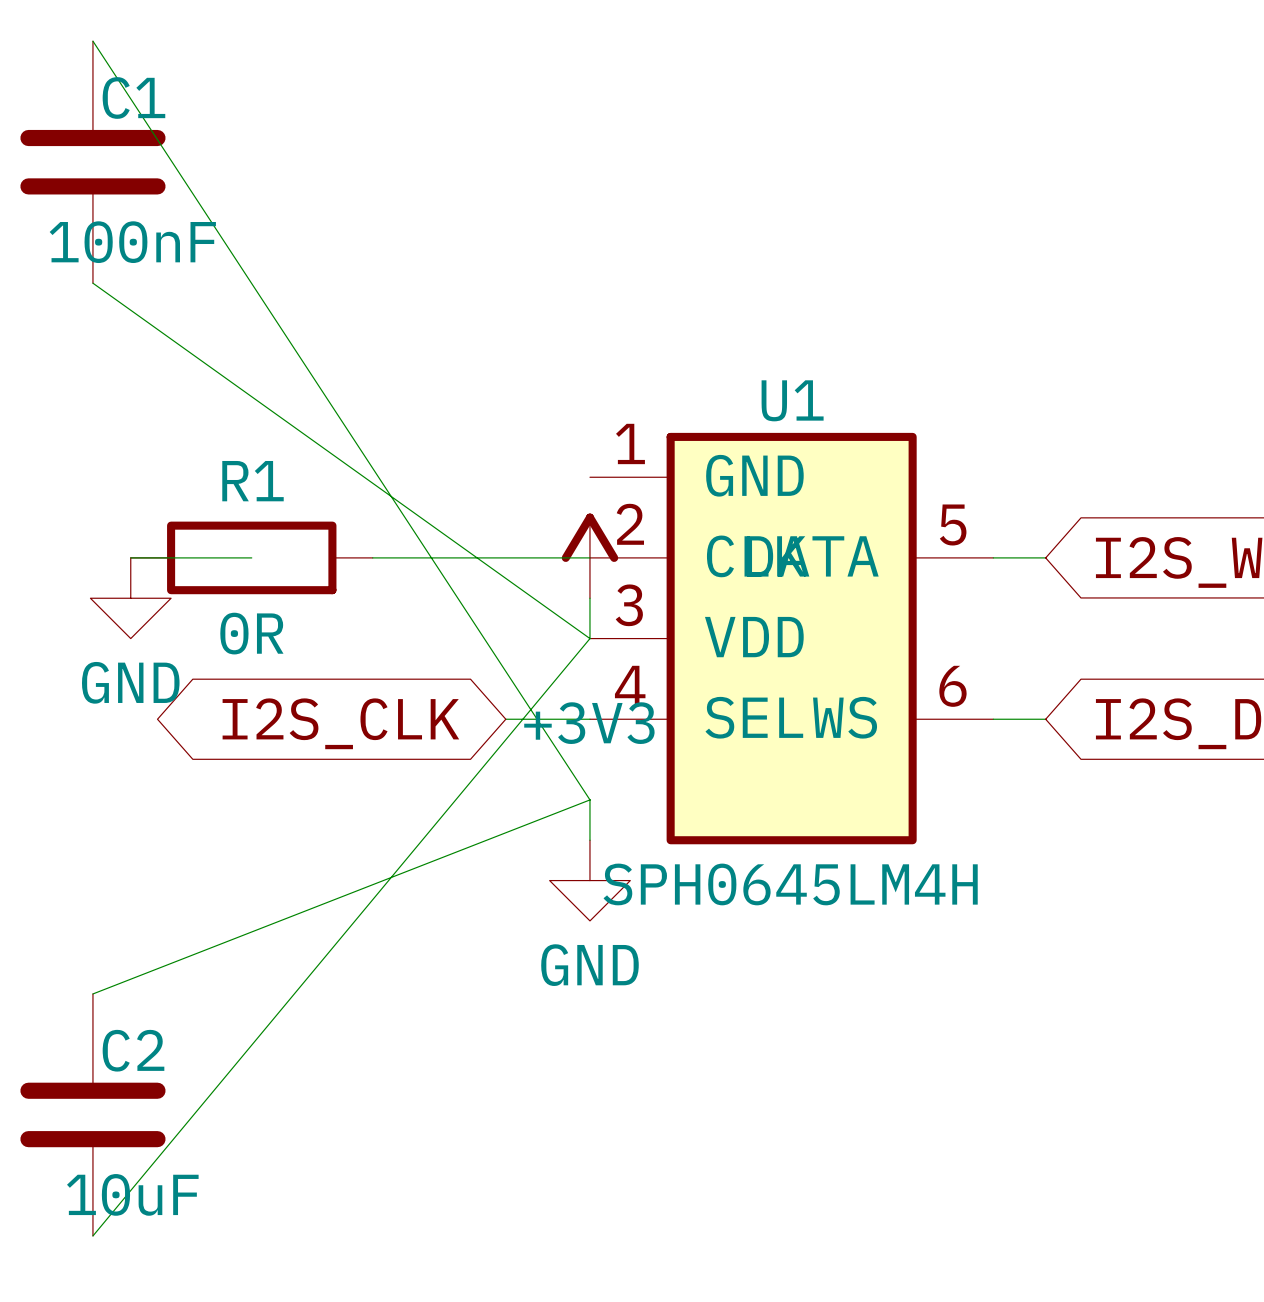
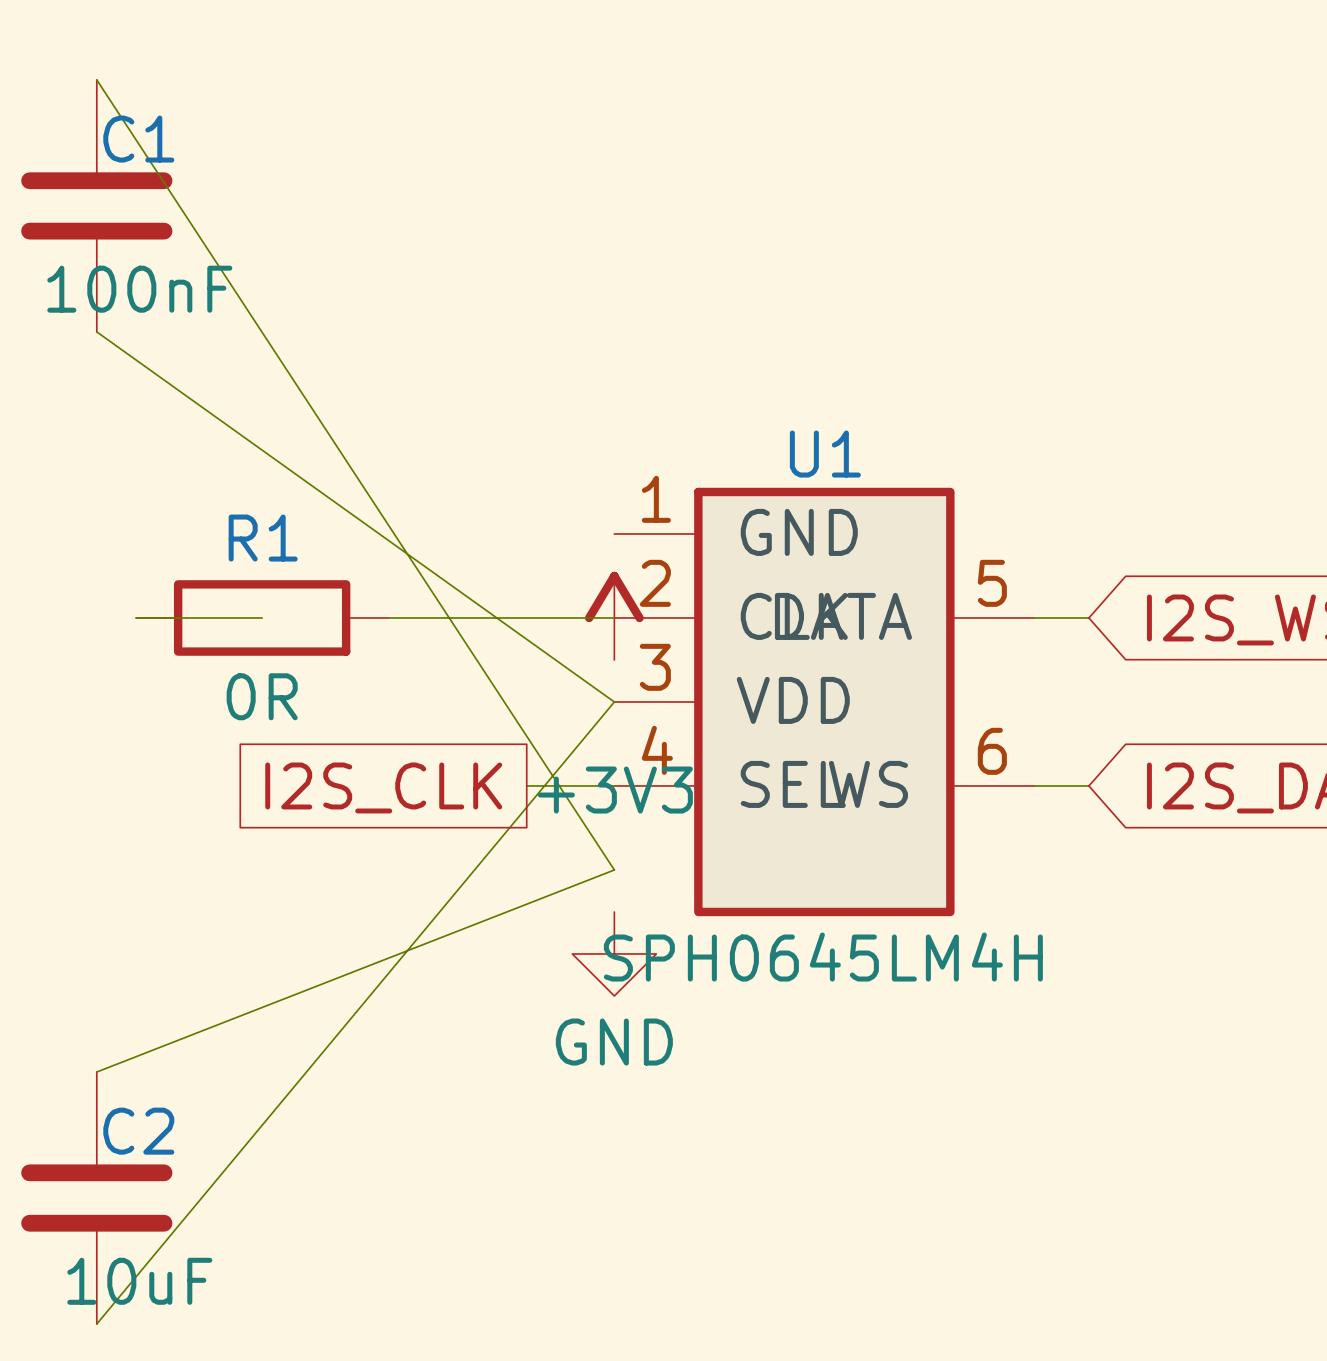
power symbol: GND (130, 598) -> none
wire: (589, 598) (589, 638) -> none
global label shape: bidirectional (340, 723) -> passive (383, 787)
wire: (589, 799) (589, 840) -> none

